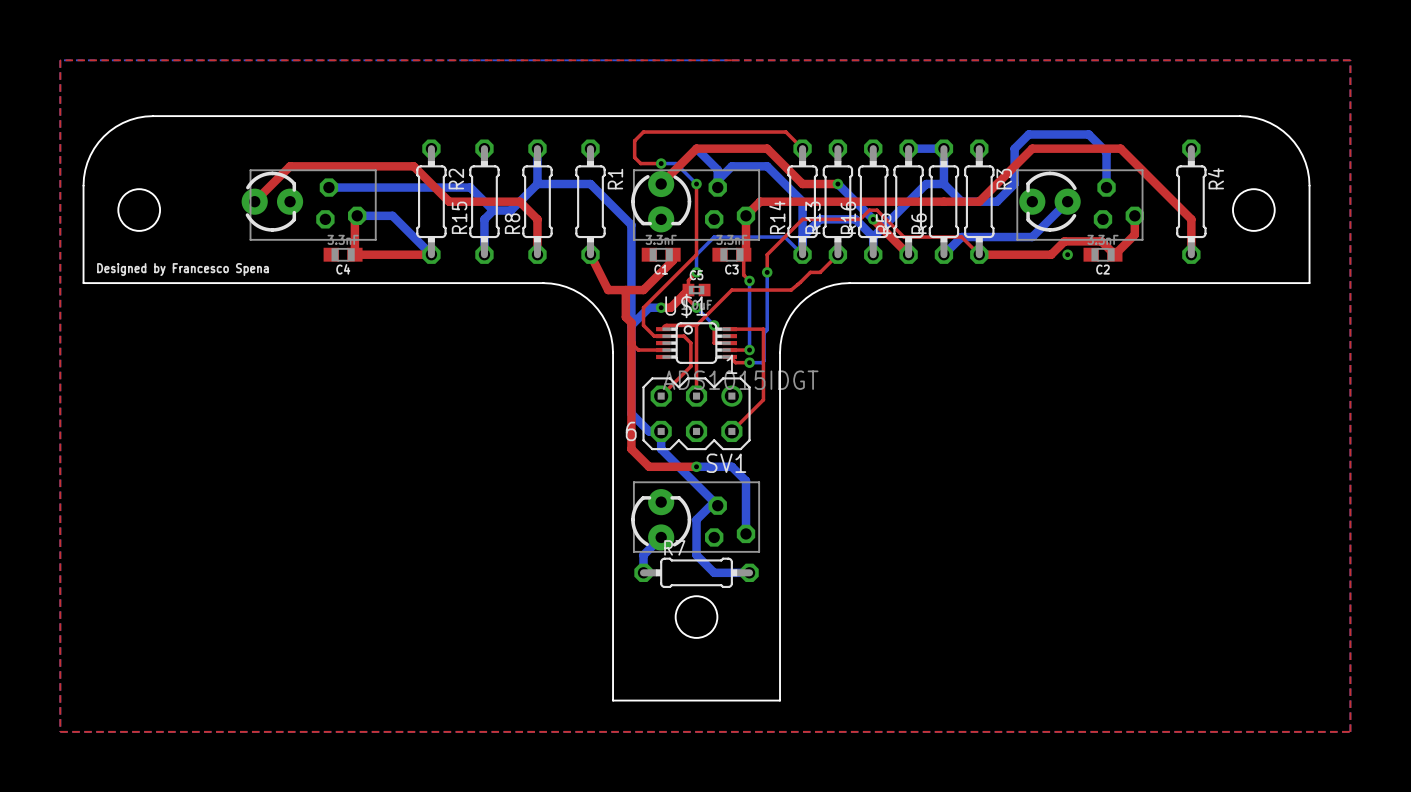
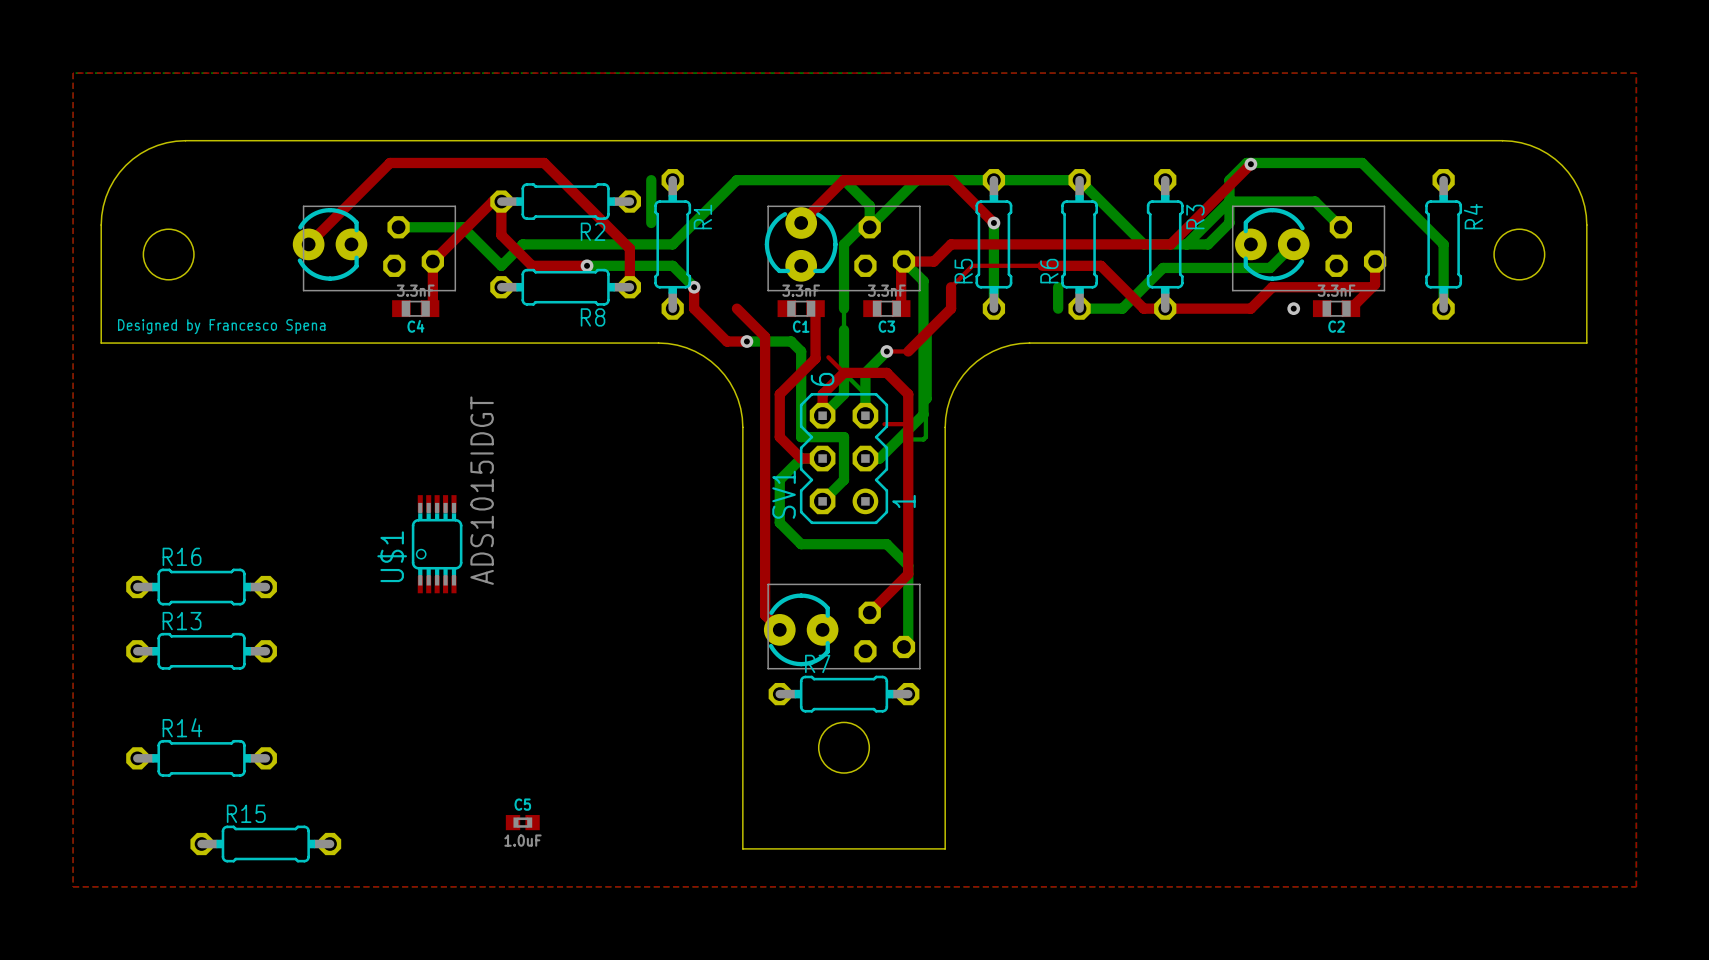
bottom track: (1088, 134) (1106, 152) (1106, 187) -> (1319, 162) (1362, 162) (1443, 244) (1443, 308)
via: none -> (1250, 164)
top track: (767, 148) (802, 184) (837, 184) -> (929, 180) (951, 180) (993, 222)
top track: (802, 148) (785, 132) (643, 132) (634, 140) (634, 157) (640, 163) (661, 163) -> none
bottom track: (908, 148) (943, 148) (943, 184) -> none
bottom track: (661, 163) (676, 163) (696, 184) -> none
via: (661, 163) -> none
top track: (290, 166) (406, 166) -> (430, 308) (432, 305) (432, 261) (492, 201)
top track: none -> (351, 201) (390, 162) (544, 162) (629, 248) (629, 287)
top track: (413, 166) (449, 201) (519, 201) (537, 219) (537, 254) -> (501, 201) (501, 235) (532, 265) (587, 265)
bottom track: (717, 180) (731, 166) (767, 166) (802, 201) (802, 254) (784, 237) (714, 237) (696, 254) -> (1165, 244) (1143, 244) (1079, 180) (916, 180) (869, 227) (861, 227) (844, 244) (844, 308)
top track: (696, 184) (696, 254) (643, 307) (643, 325) (654, 336) (683, 336) (690, 343) (690, 366) (661, 396) -> none
via: (696, 184) -> none
bottom track: none -> (993, 222) (993, 308)
bottom track: (837, 184) (873, 219) -> none
via position: (837, 184) -> (993, 222)
bottom track: (943, 184) (961, 201) -> none
bottom track: (943, 184) (926, 184) (873, 237) (855, 219) (820, 219) (802, 237) -> none
bottom track: (381, 187) (470, 187) (493, 210) -> (462, 227) (501, 265) (522, 244) (672, 244) (736, 180) (844, 180)
bottom track: none -> (1340, 227) (1315, 201) (1229, 201) (1186, 244)
R2 rotation: 0° (431, 201) -> 90° clockwise (565, 201)
R15 rotation: 0° (484, 201) -> 90° clockwise (265, 844)
R15 position: (484, 201) -> (265, 844)
R8 rotation: 0° (537, 201) -> 90° clockwise (565, 287)
R8 position: (537, 201) -> (565, 287)
R1 position: (590, 201) -> (672, 244)
top track: (784, 201) (760, 201) (746, 215) (743, 275) (749, 280) -> (951, 244) (933, 261) (903, 261) (901, 264) (901, 308)
R14 rotation: 0° (802, 201) -> 90° clockwise (201, 758)
R14 position: (802, 201) -> (201, 758)
R13 rotation: 0° (837, 201) -> 90° clockwise (201, 651)
R13 position: (837, 201) -> (201, 651)
R16 rotation: 0° (873, 201) -> 90° clockwise (201, 587)
R16 position: (873, 201) -> (201, 587)
R5 position: (908, 201) -> (993, 244)
R6 position: (943, 201) -> (1079, 244)
top track: (966, 201) (979, 201) (1032, 148) (1120, 148) (1191, 219) (1191, 254) -> (1170, 244) (1250, 164)
R3 position: (979, 201) -> (1165, 244)
bottom track: (493, 210) (484, 219) (484, 254) -> none
bottom track: (493, 210) (510, 210) (537, 184) (590, 184) (631, 224) (631, 413) (649, 431) (661, 431) (661, 449) (717, 505) -> none
bottom track: (357, 215) (392, 215) (431, 254) -> none
top track: (357, 215) (354, 218) (354, 254) (431, 254) -> none
bottom track: none -> (903, 261) (923, 281) (923, 414) (879, 458) (865, 458)
bottom track: none -> (587, 265) (672, 265) (694, 287)
via: none -> (587, 265)
top track: (860, 219) (869, 210) (877, 210) (903, 237) (961, 237) (979, 254) -> (1042, 265) (1100, 265) (1143, 308) (1186, 308)
top track: (873, 219) (908, 254) -> none
via: (873, 219) -> none
bottom track: (1048, 221) (1032, 237) (961, 237) (943, 254) -> (1270, 267) (1163, 267) (1122, 308) (1079, 308)
R8 name position: R8 (512, 223) -> R8 (593, 317)
top track: none -> (694, 287) (694, 308) (726, 341) (746, 341)
via: none -> (694, 287)
top track: (784, 237) (767, 254) (767, 272) -> (951, 287) (951, 308) (908, 351)
top track: (590, 254) (608, 290) (643, 290) (673, 260) -> (822, 458) (801, 458) (779, 437) (779, 394) (815, 358) (815, 315)
top track: (837, 254) (820, 272) (810, 272) (791, 290) (749, 290) -> none
top track: (1032, 254) (1051, 254) (1064, 241) (1101, 241) (1114, 254) -> (1250, 308) (1272, 287) (1372, 287)
bottom track: none -> (844, 330) (844, 394) (822, 415)
top track: (696, 272) (688, 280) (688, 290) (670, 307) (661, 307) -> none
via: (696, 272) -> none
via: (767, 272) -> none
bottom track: (749, 280) (749, 350) -> none
via: (749, 280) -> none
bottom track: none -> (746, 341) (791, 341) (801, 351) (801, 437) (844, 437) (844, 479) (822, 501)
via: none -> (746, 341)
top track: (625, 290) (625, 317) (631, 322) -> (736, 308) (765, 336) (765, 391)
C5 position: (696, 290) -> (522, 822)
bottom track: none -> (886, 351) (865, 372) (865, 415)
top track: (731, 290) (696, 325) -> none
via: none -> (886, 351)
bottom track: (661, 307) (649, 307) (631, 325) -> none
via: (661, 307) -> none
via: (696, 307) -> none
top track: (696, 325) (666, 325) (663, 329) -> none
top track: (696, 325) (696, 396) -> none
top track: (714, 325) (714, 343) (729, 343) -> none
via: (714, 325) -> none
top track: (729, 329) (763, 329) (763, 399) (731, 431) -> none
top track: (631, 343) (638, 350) (663, 350) -> none
top track: none -> (822, 415) (822, 394) (844, 372) (886, 372) (908, 394) (908, 574) (869, 612)
U$1 rotation: 0° (696, 343) -> 90° counterclockwise (437, 544)
U$1 position: (696, 343) -> (437, 544)
via: (749, 350) -> none
top track: (729, 356) (735, 362) (749, 362) -> none
via: (749, 362) -> none
SV1 footprint: [642, 377, 751, 451] -> [799, 393, 889, 525]
top track: (631, 449) (649, 466) (696, 466) -> (765, 544) (765, 615) (779, 629)
SV1 name position: SV1 (726, 463) -> SV1 (784, 494)
bottom track: (696, 466) (731, 466) (746, 480) (746, 533) -> (822, 458) (801, 458) (779, 479) (779, 522) (801, 544) (886, 544) (908, 565) (908, 642) (903, 647)
via: (696, 466) -> none
bottom track: (714, 502) (696, 519) (696, 555) (714, 572) (749, 572) -> none
part rotation: 0° (661, 519) -> 90° clockwise (801, 629)
bottom track: (661, 537) (643, 555) (643, 572) -> none

